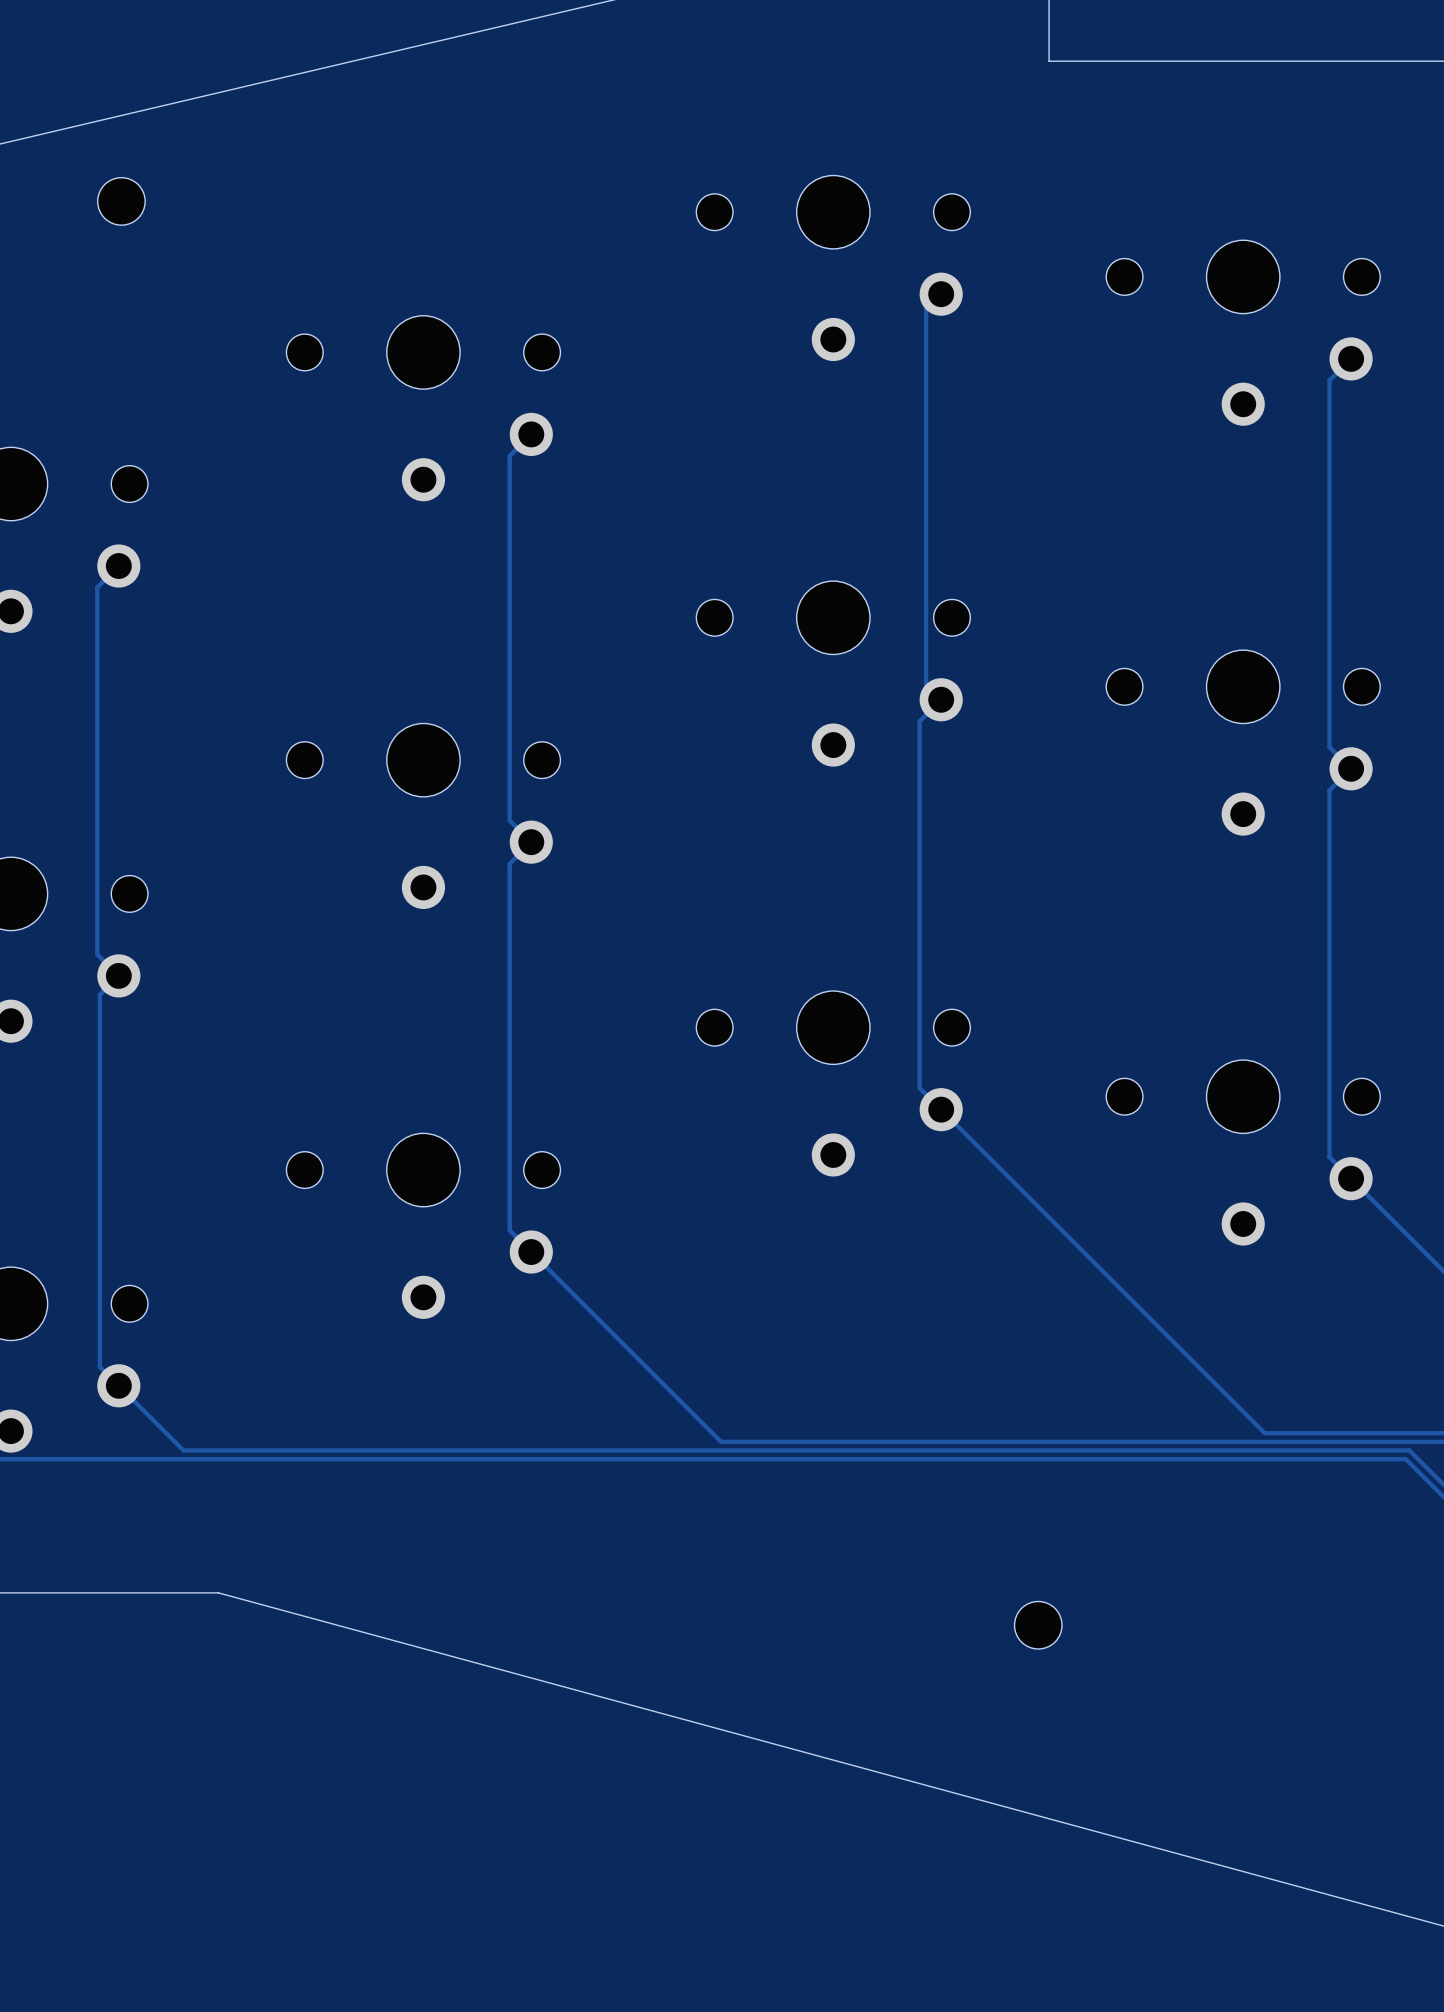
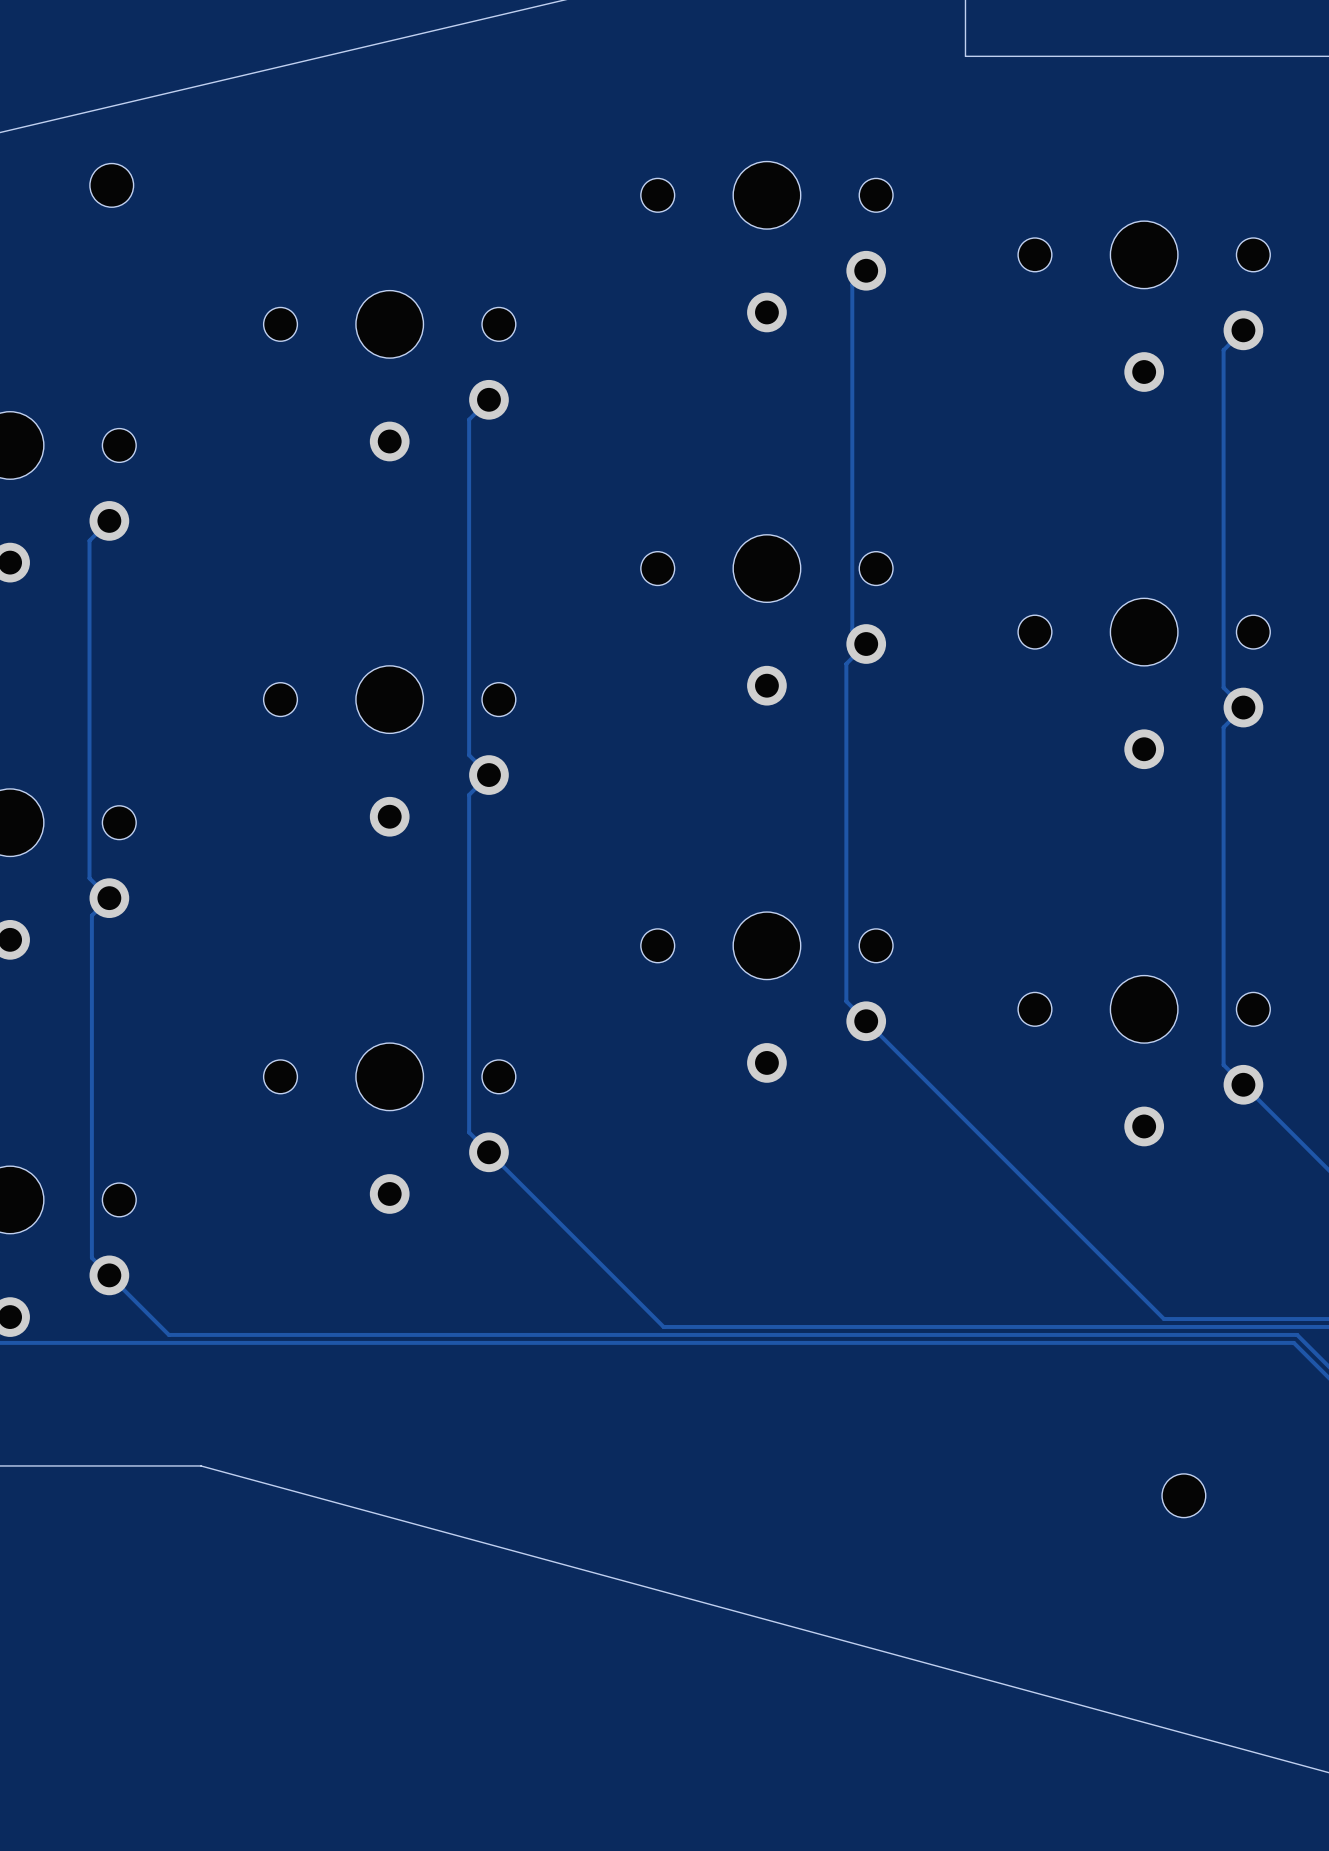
part position: (1038, 1625) -> (1183, 1495)

